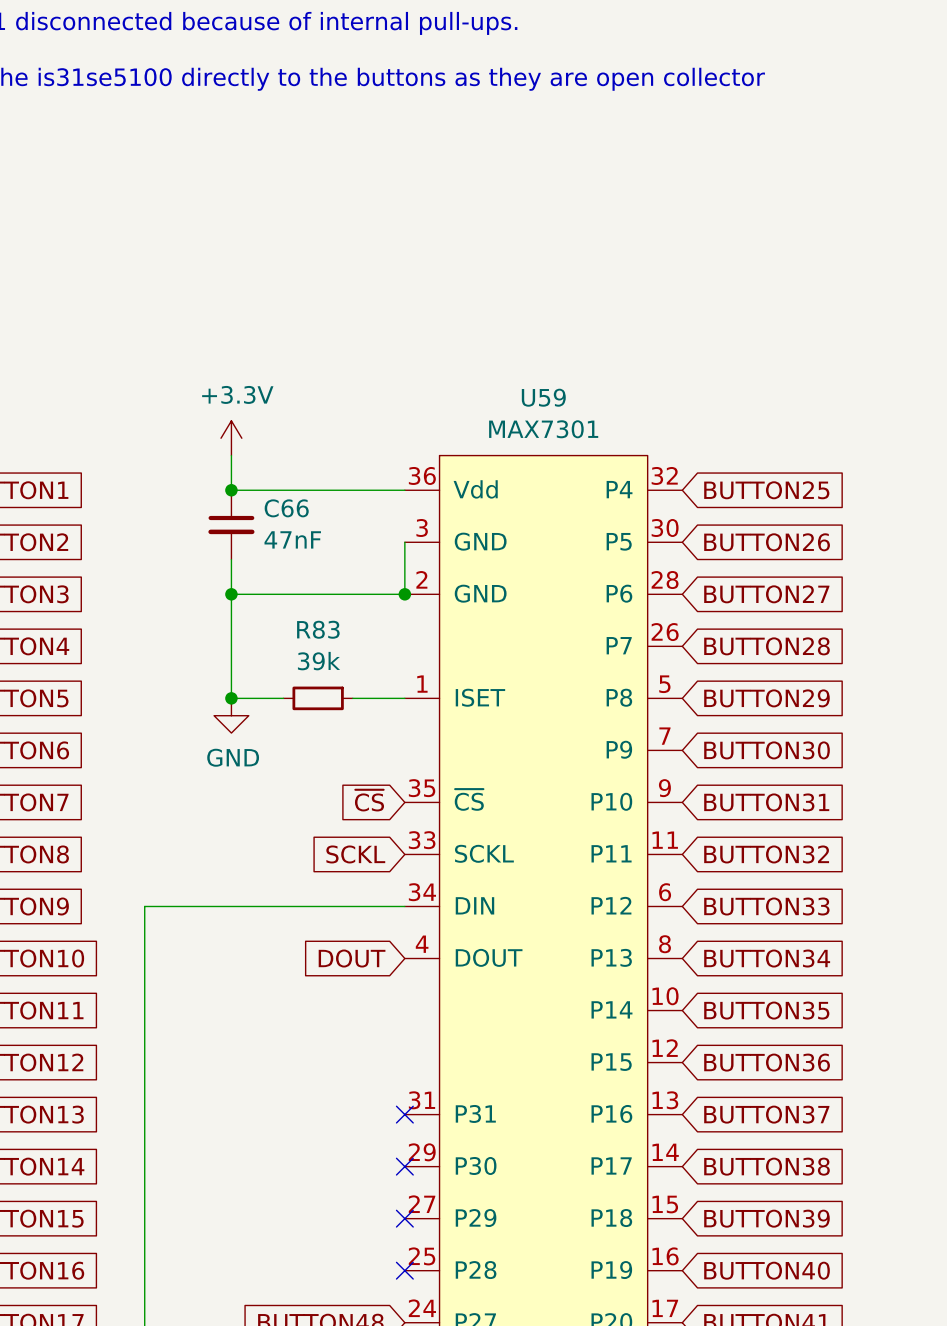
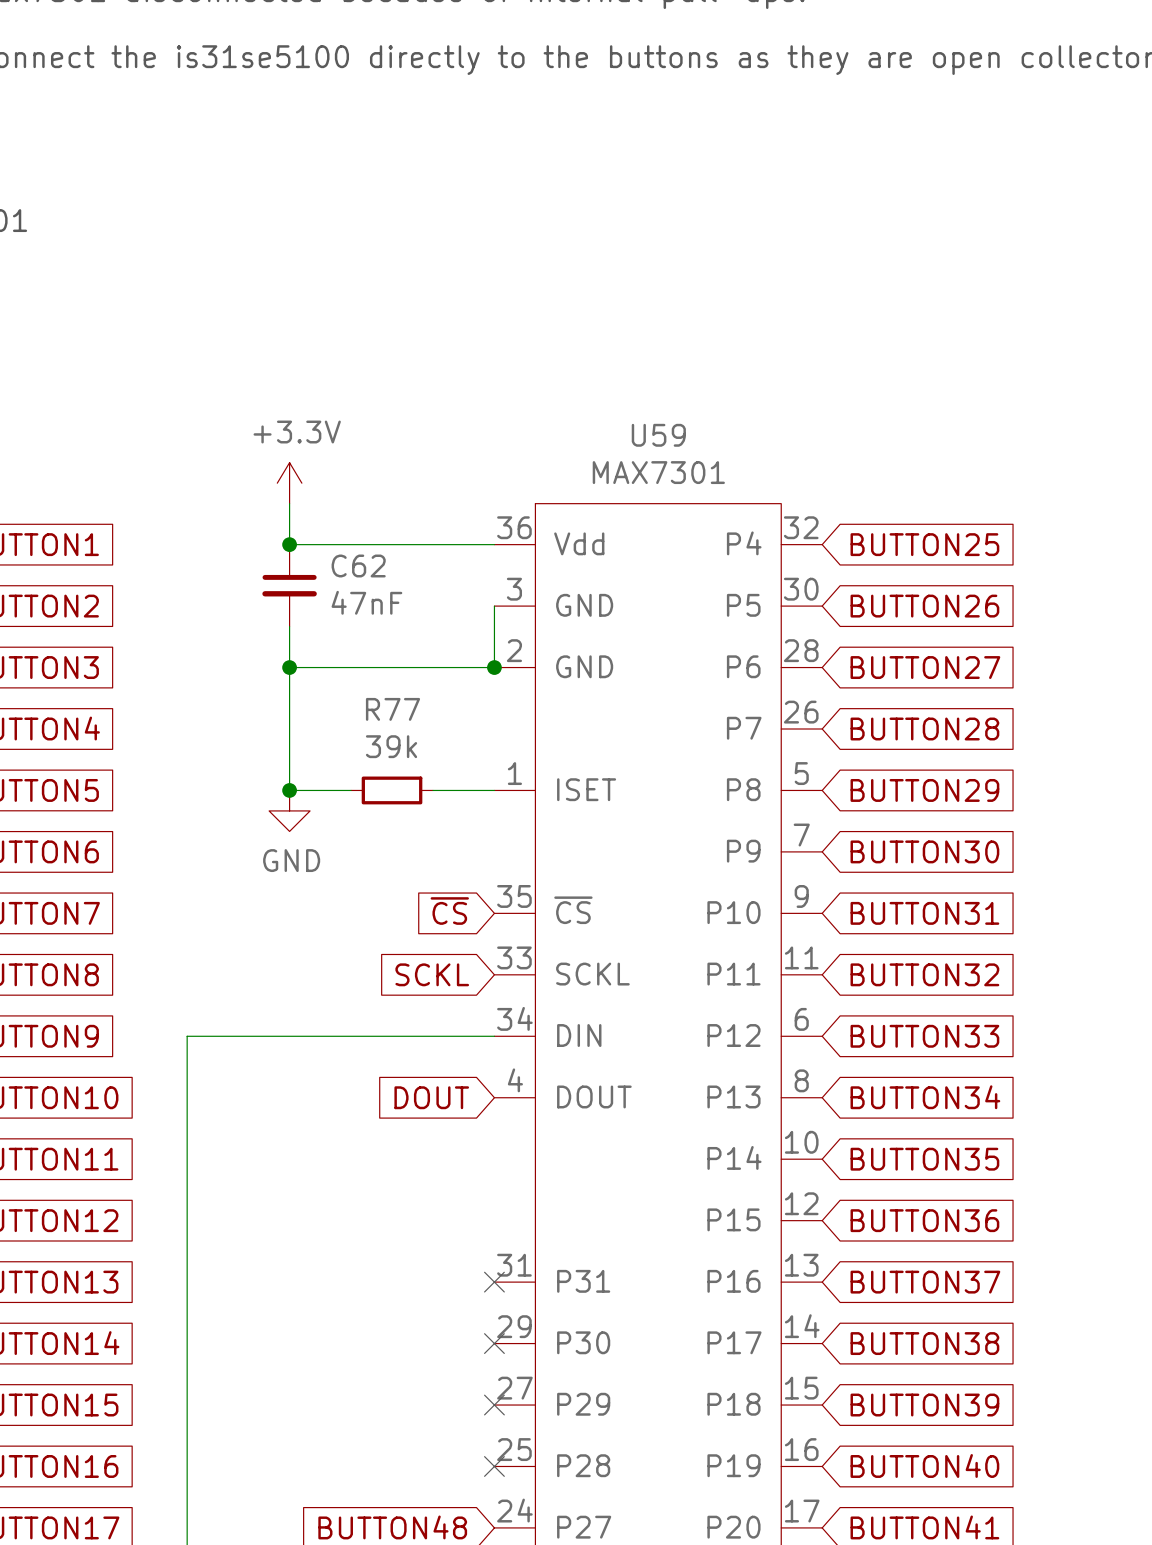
C66 name: C66 (286, 508) -> C62 (358, 565)
R83 name: R83 (318, 629) -> R77 (392, 709)

